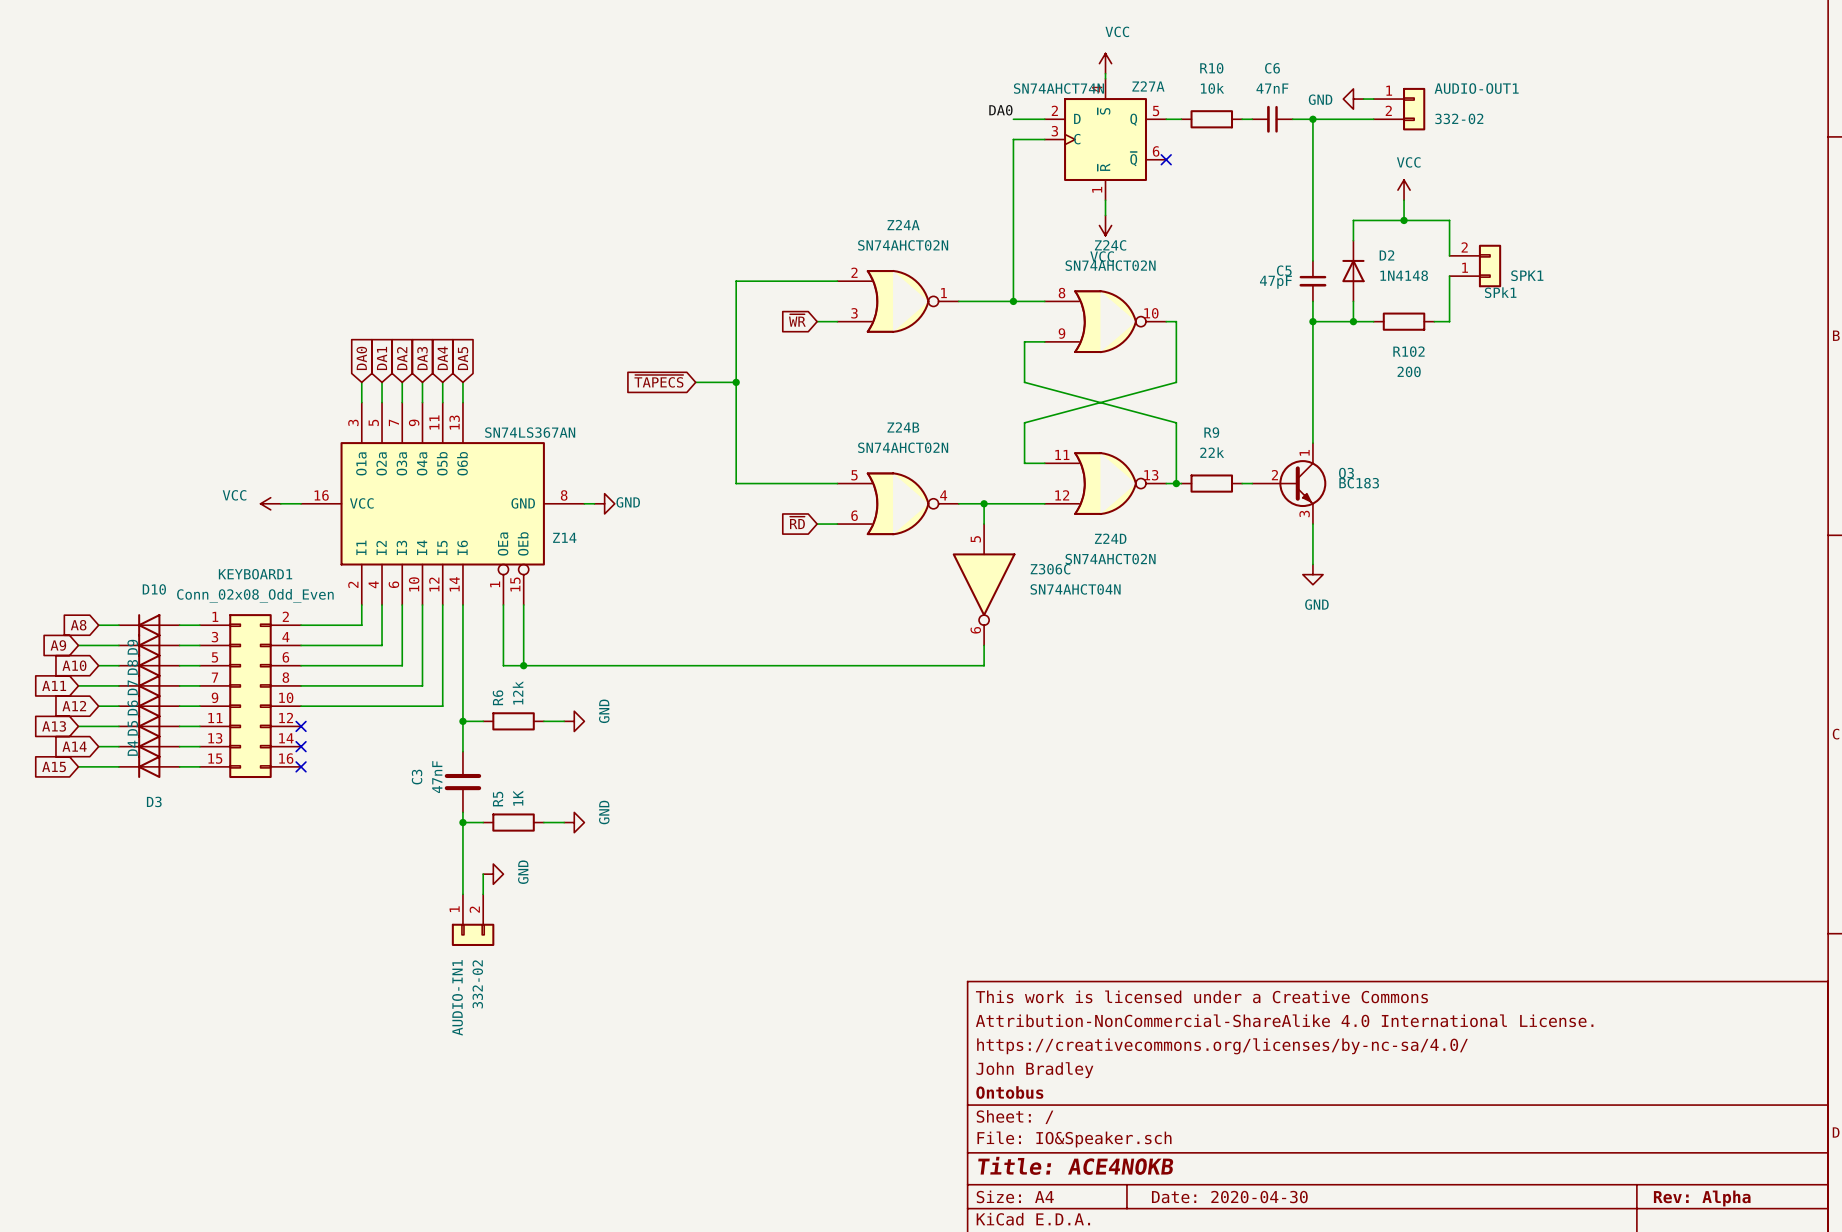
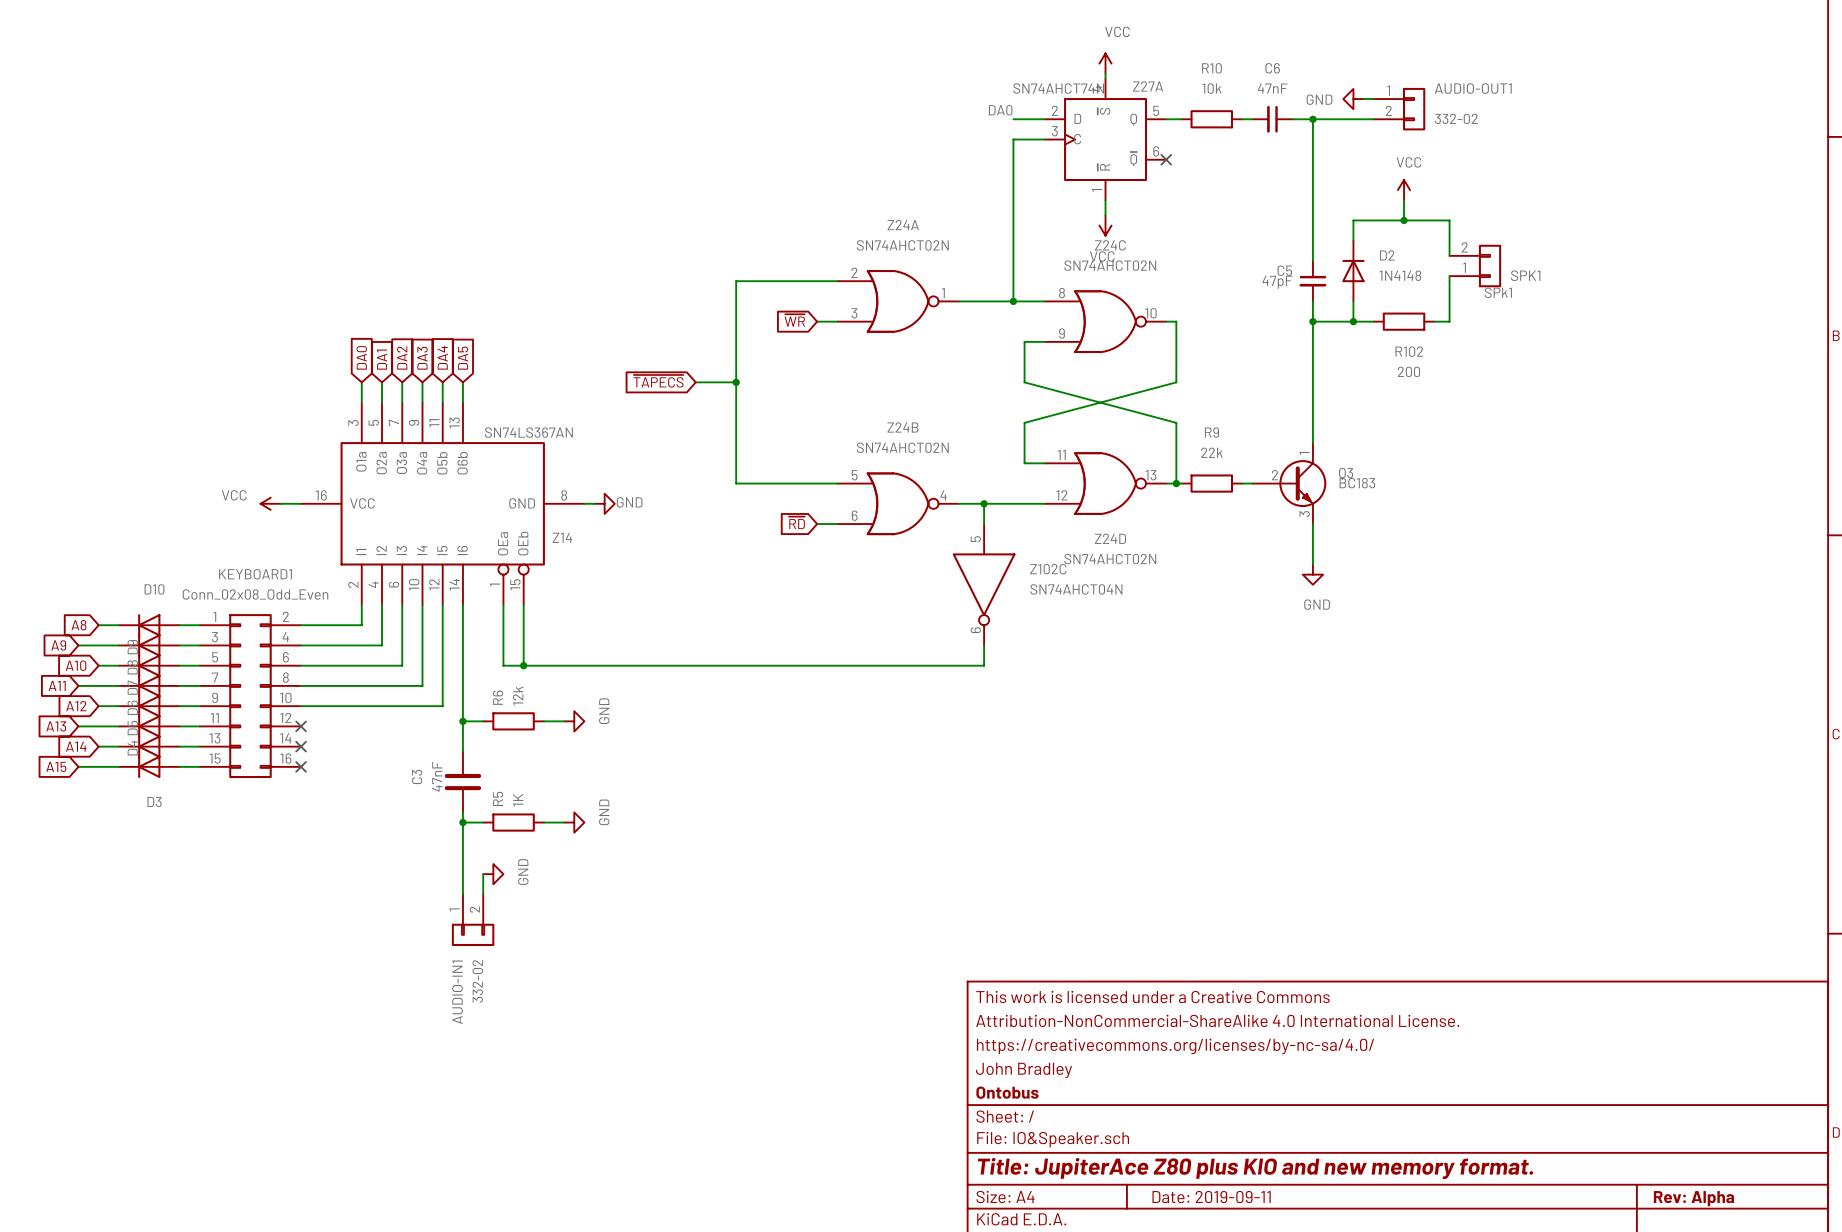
Z306C name: Z306C (1050, 569) -> Z102C (1048, 569)
title block: Title: ACE4NOKB (1075, 1165) -> Title: JupiterAce Z80 plus KIO and new memory format. (1255, 1168)
title block: Date: 2020-04-30 (1229, 1197) -> Date: 2019-09-11 (1211, 1197)

